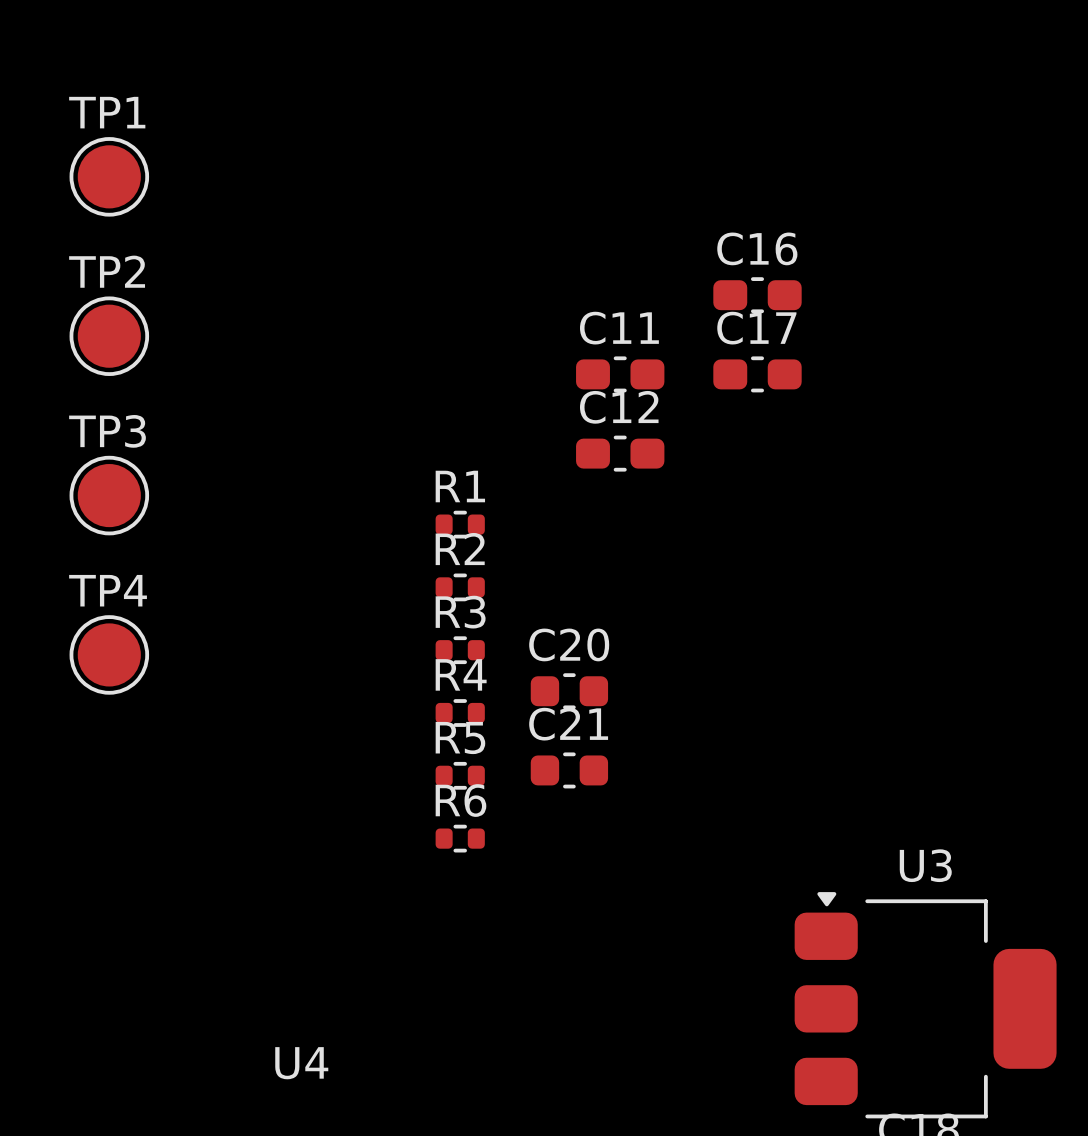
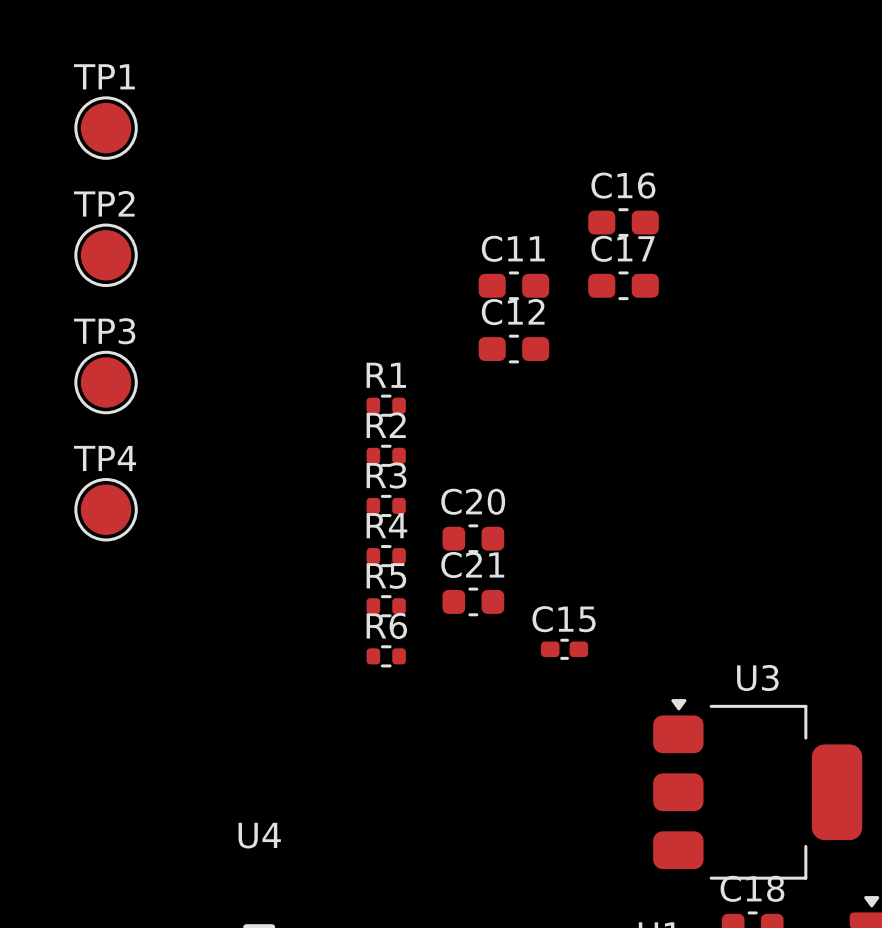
C15: none -> (564, 649)

